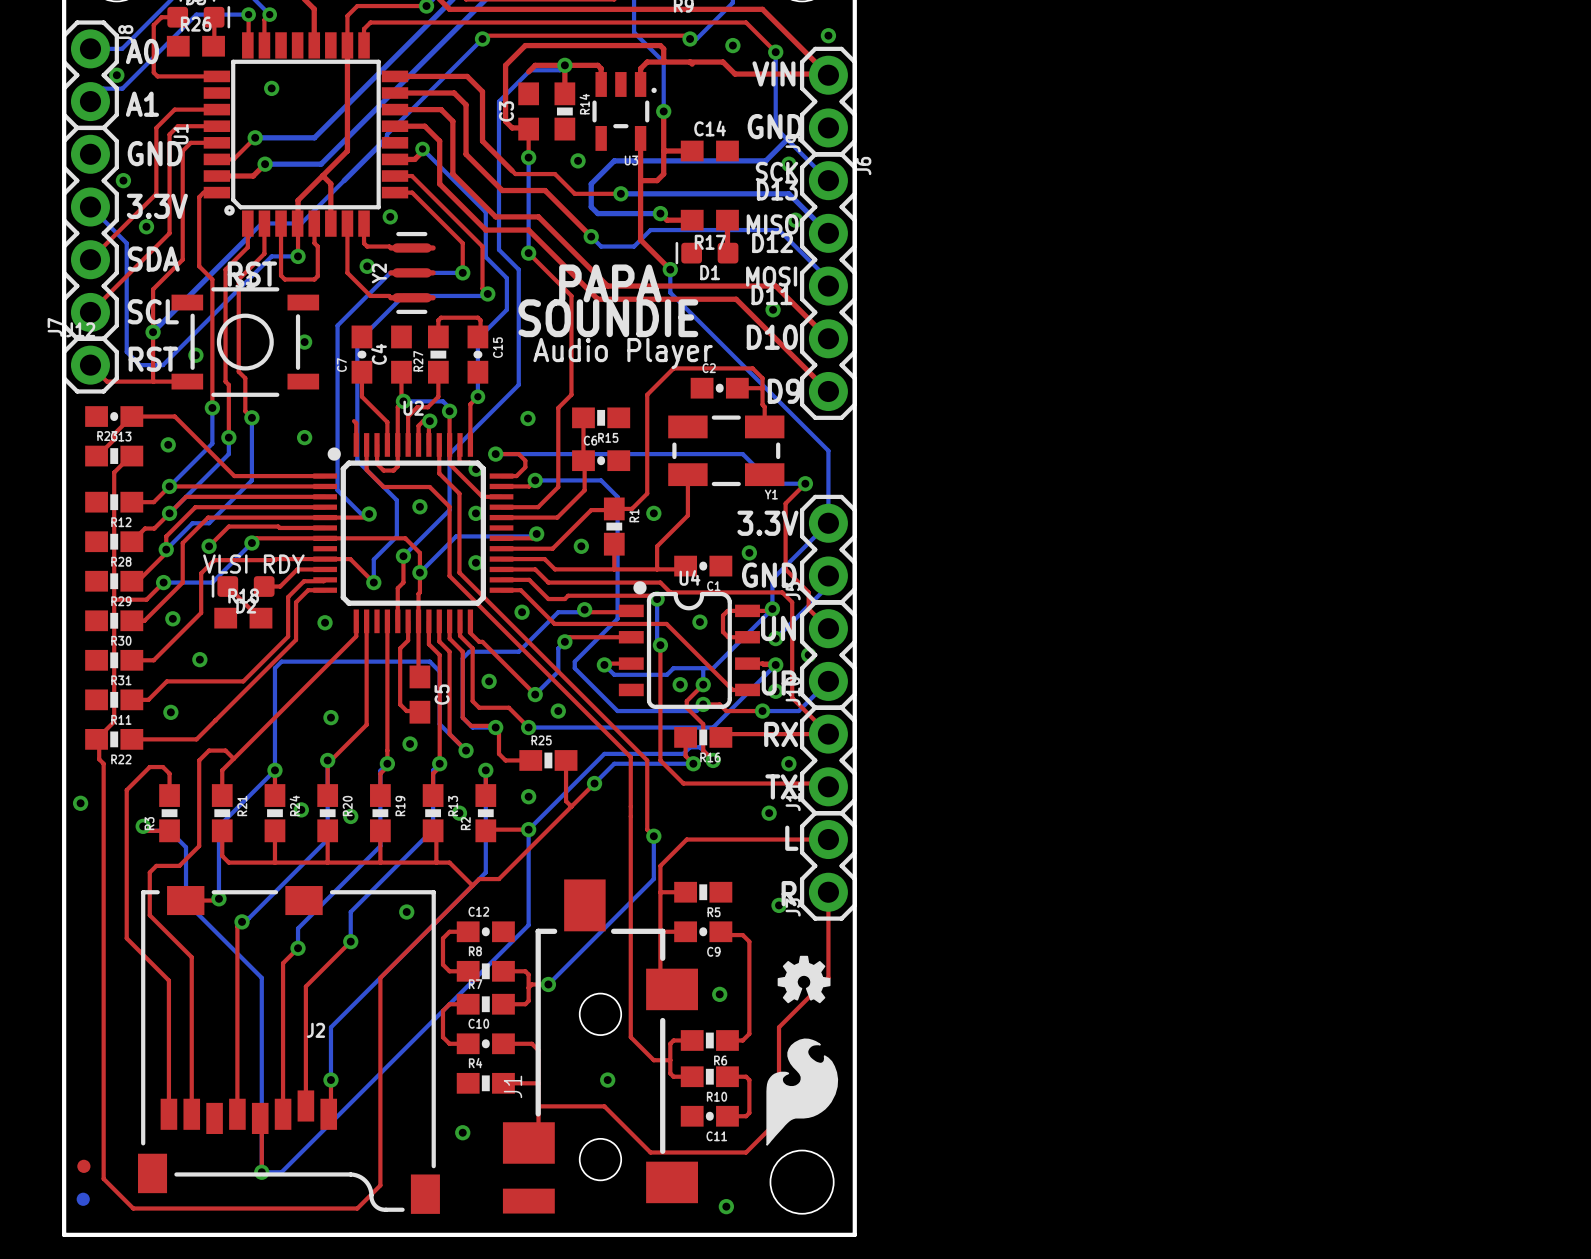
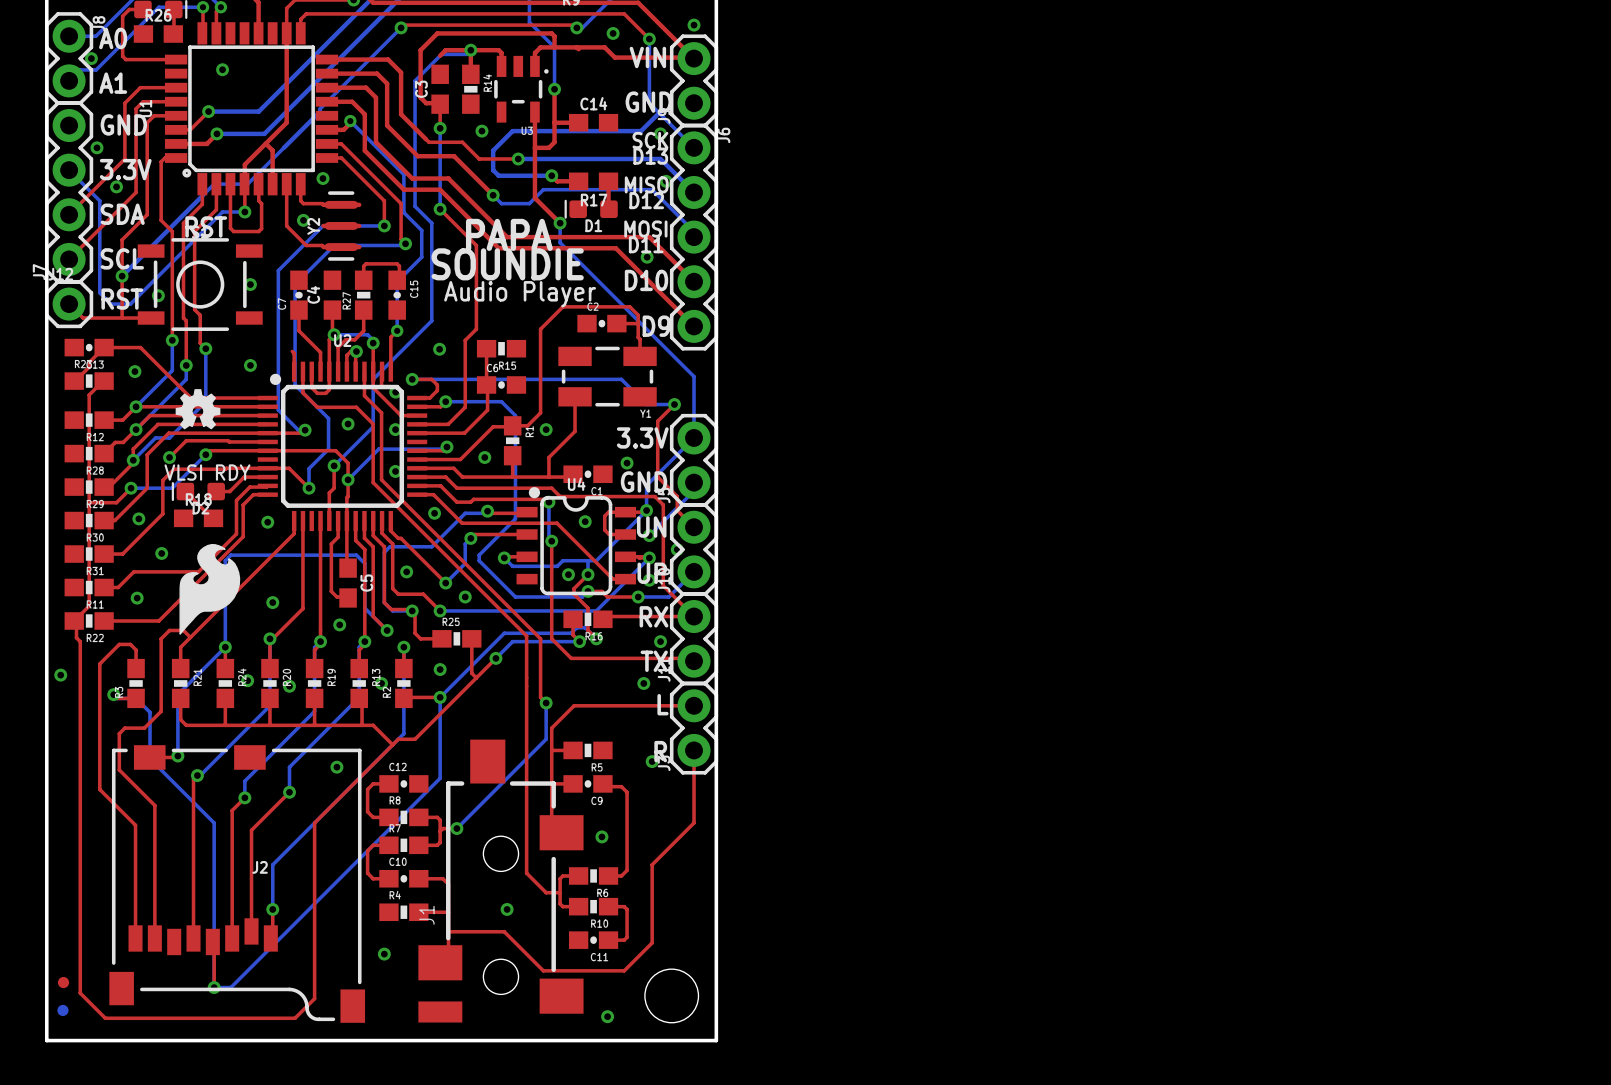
drawing: none -> [175, 389, 221, 430]
drawing: none -> [179, 543, 241, 635]
drawing: [777, 955, 831, 1004] -> none
drawing: [766, 1038, 839, 1146] -> none

